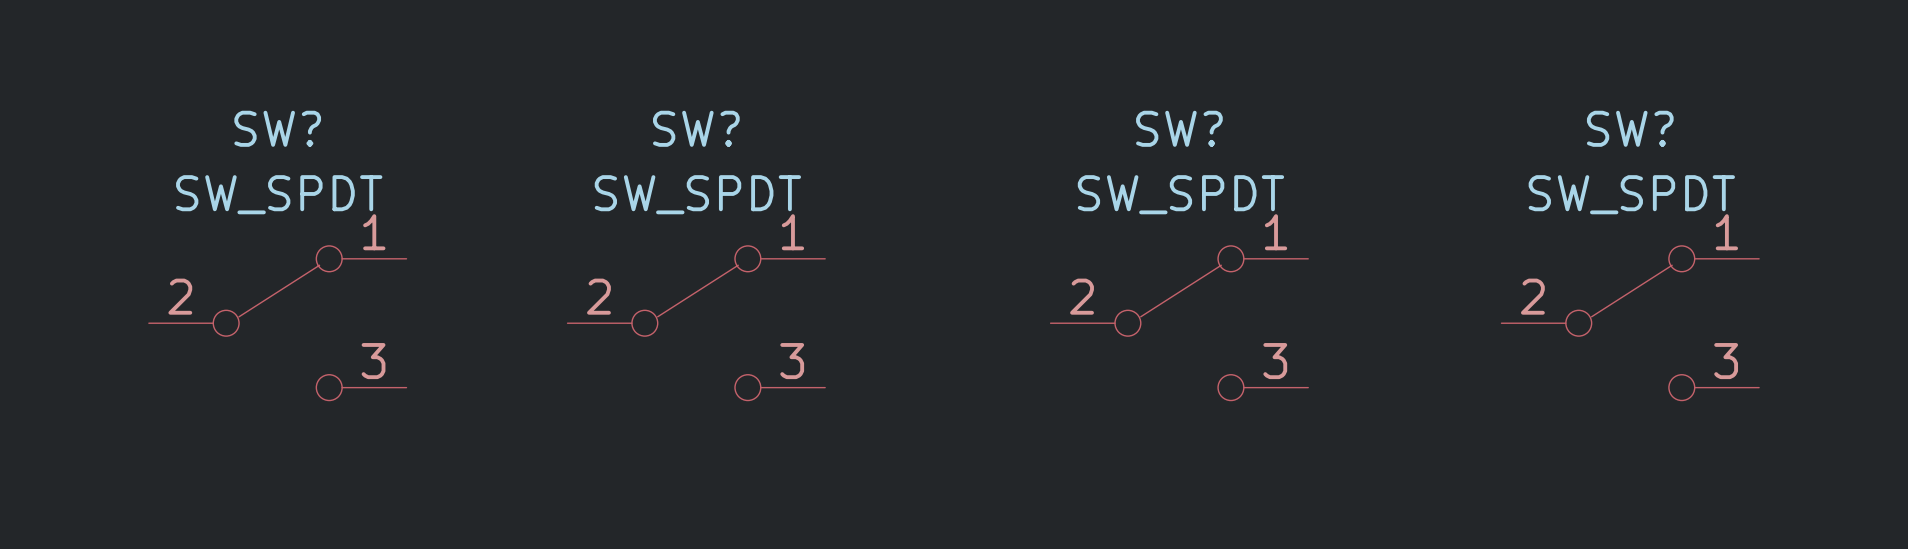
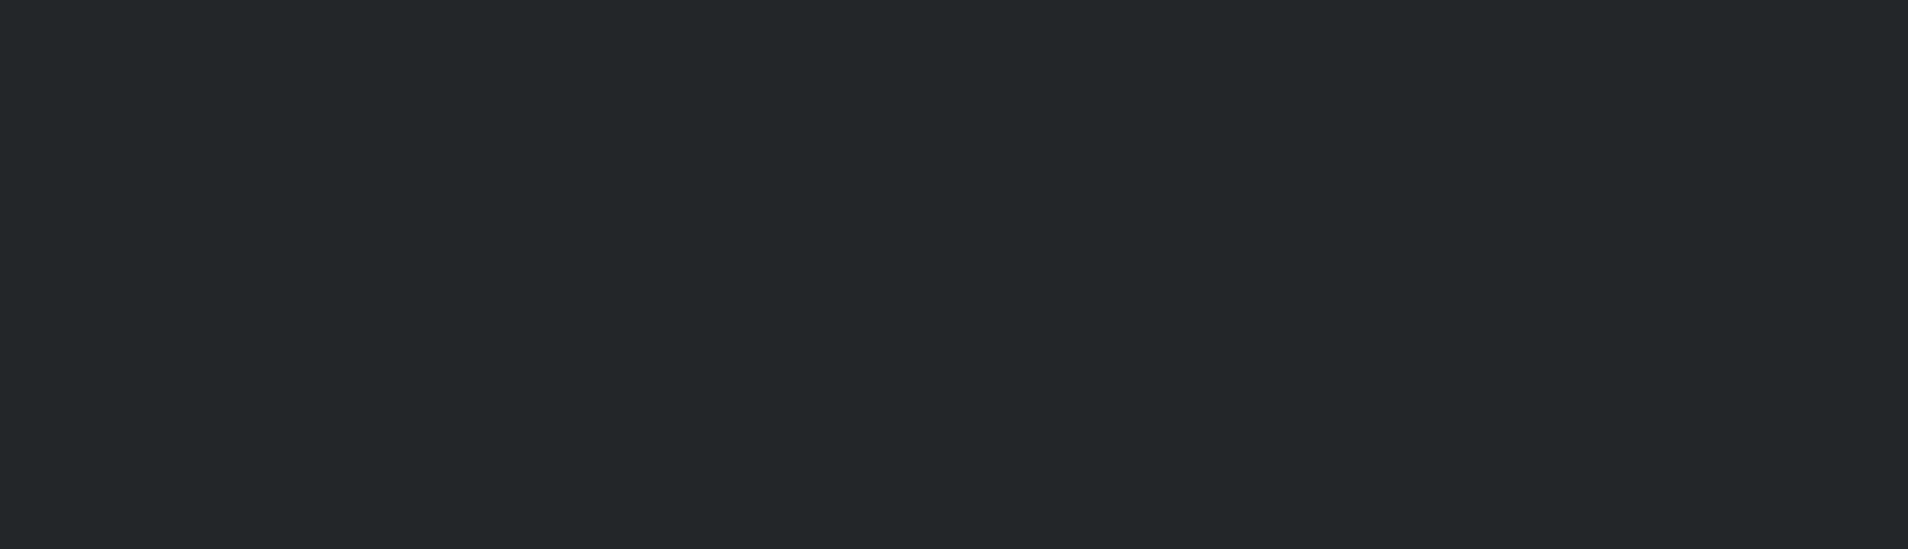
SW?: SW_SPDT (277, 323) -> none
SW?: SW_SPDT (696, 323) -> none
SW?: SW_SPDT (1179, 323) -> none
SW?: SW_SPDT (1630, 323) -> none

